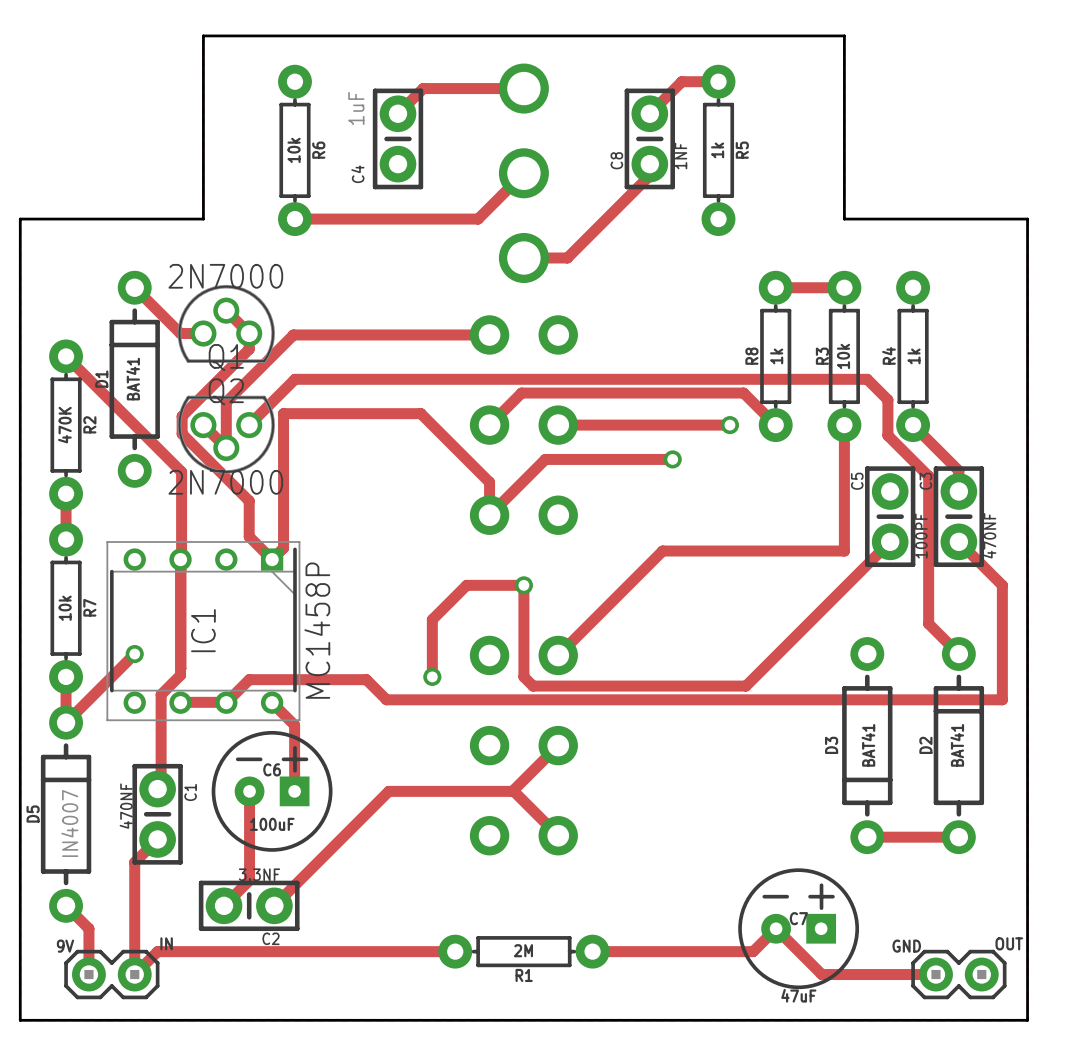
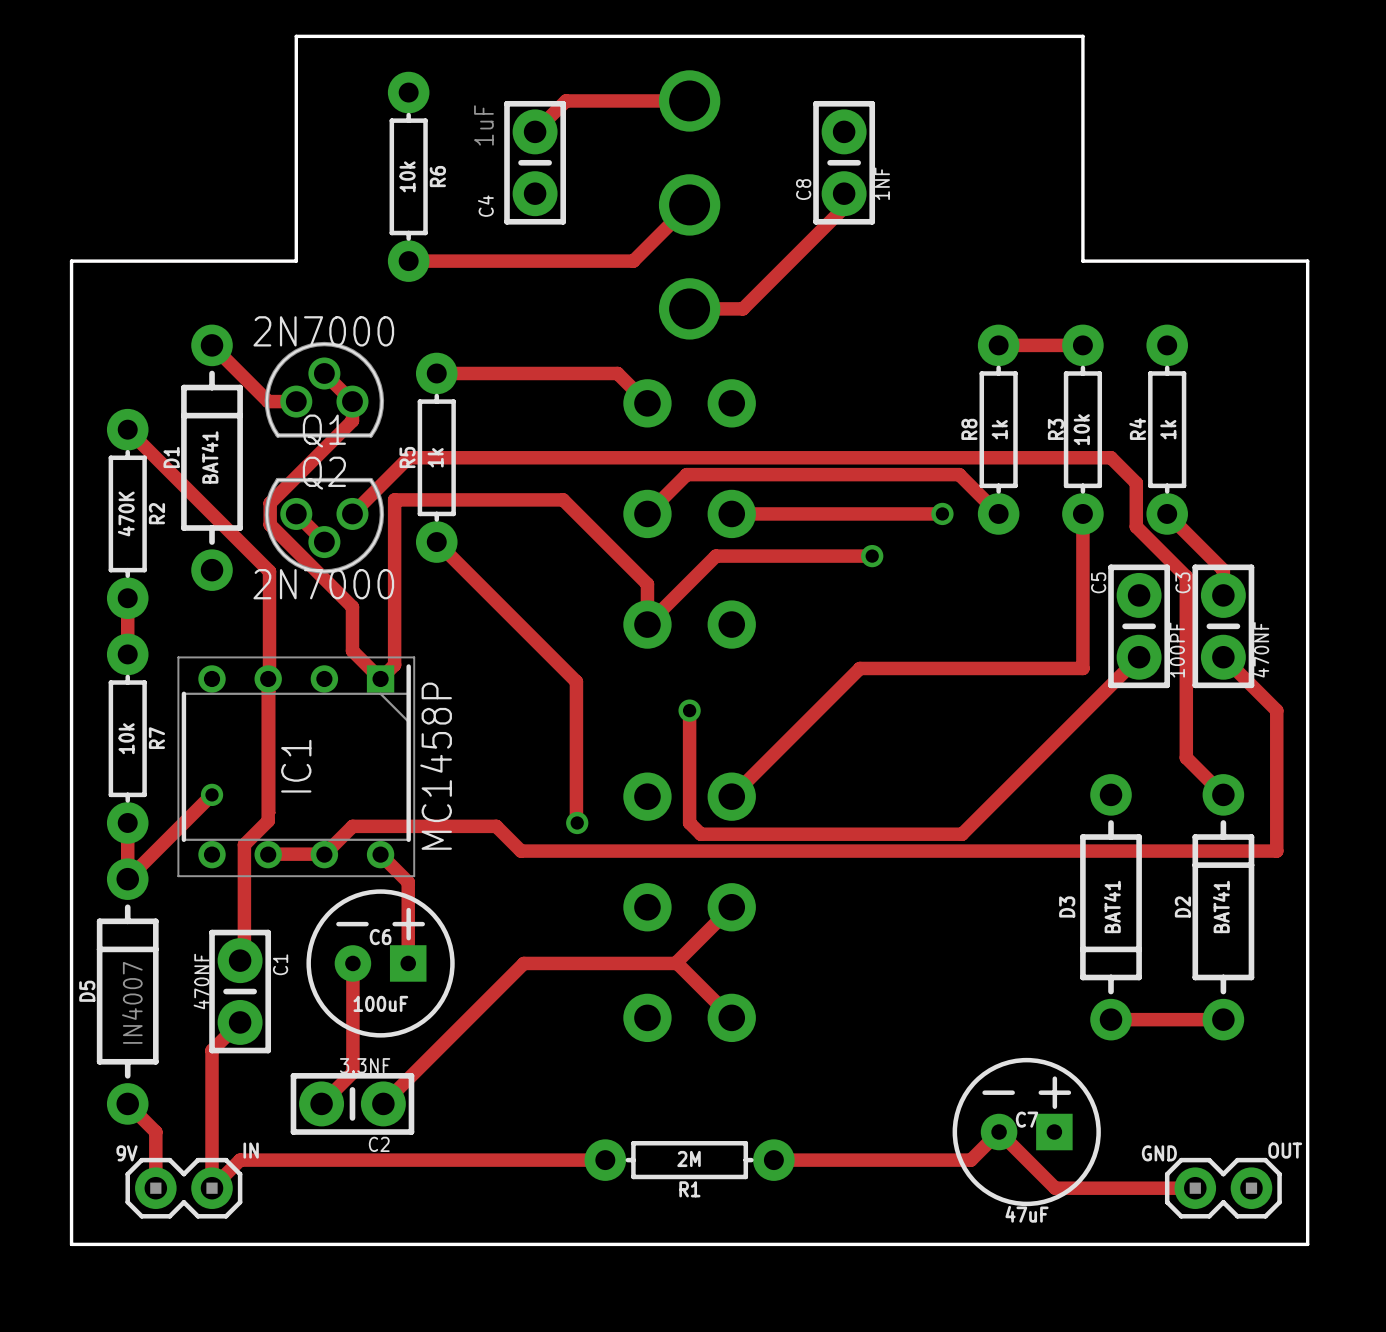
track: (718, 81) (681, 81) (649, 113) -> none
R5 position: (718, 150) -> (436, 457)
R5 name position: R5 (742, 150) -> R5 (407, 457)
track: (489, 334) (293, 334) (226, 402) (226, 447) -> (647, 403) (617, 373) (436, 373)
track: (523, 585) (466, 585) (432, 619) (432, 676) -> (436, 542) (576, 681) (577, 822)

